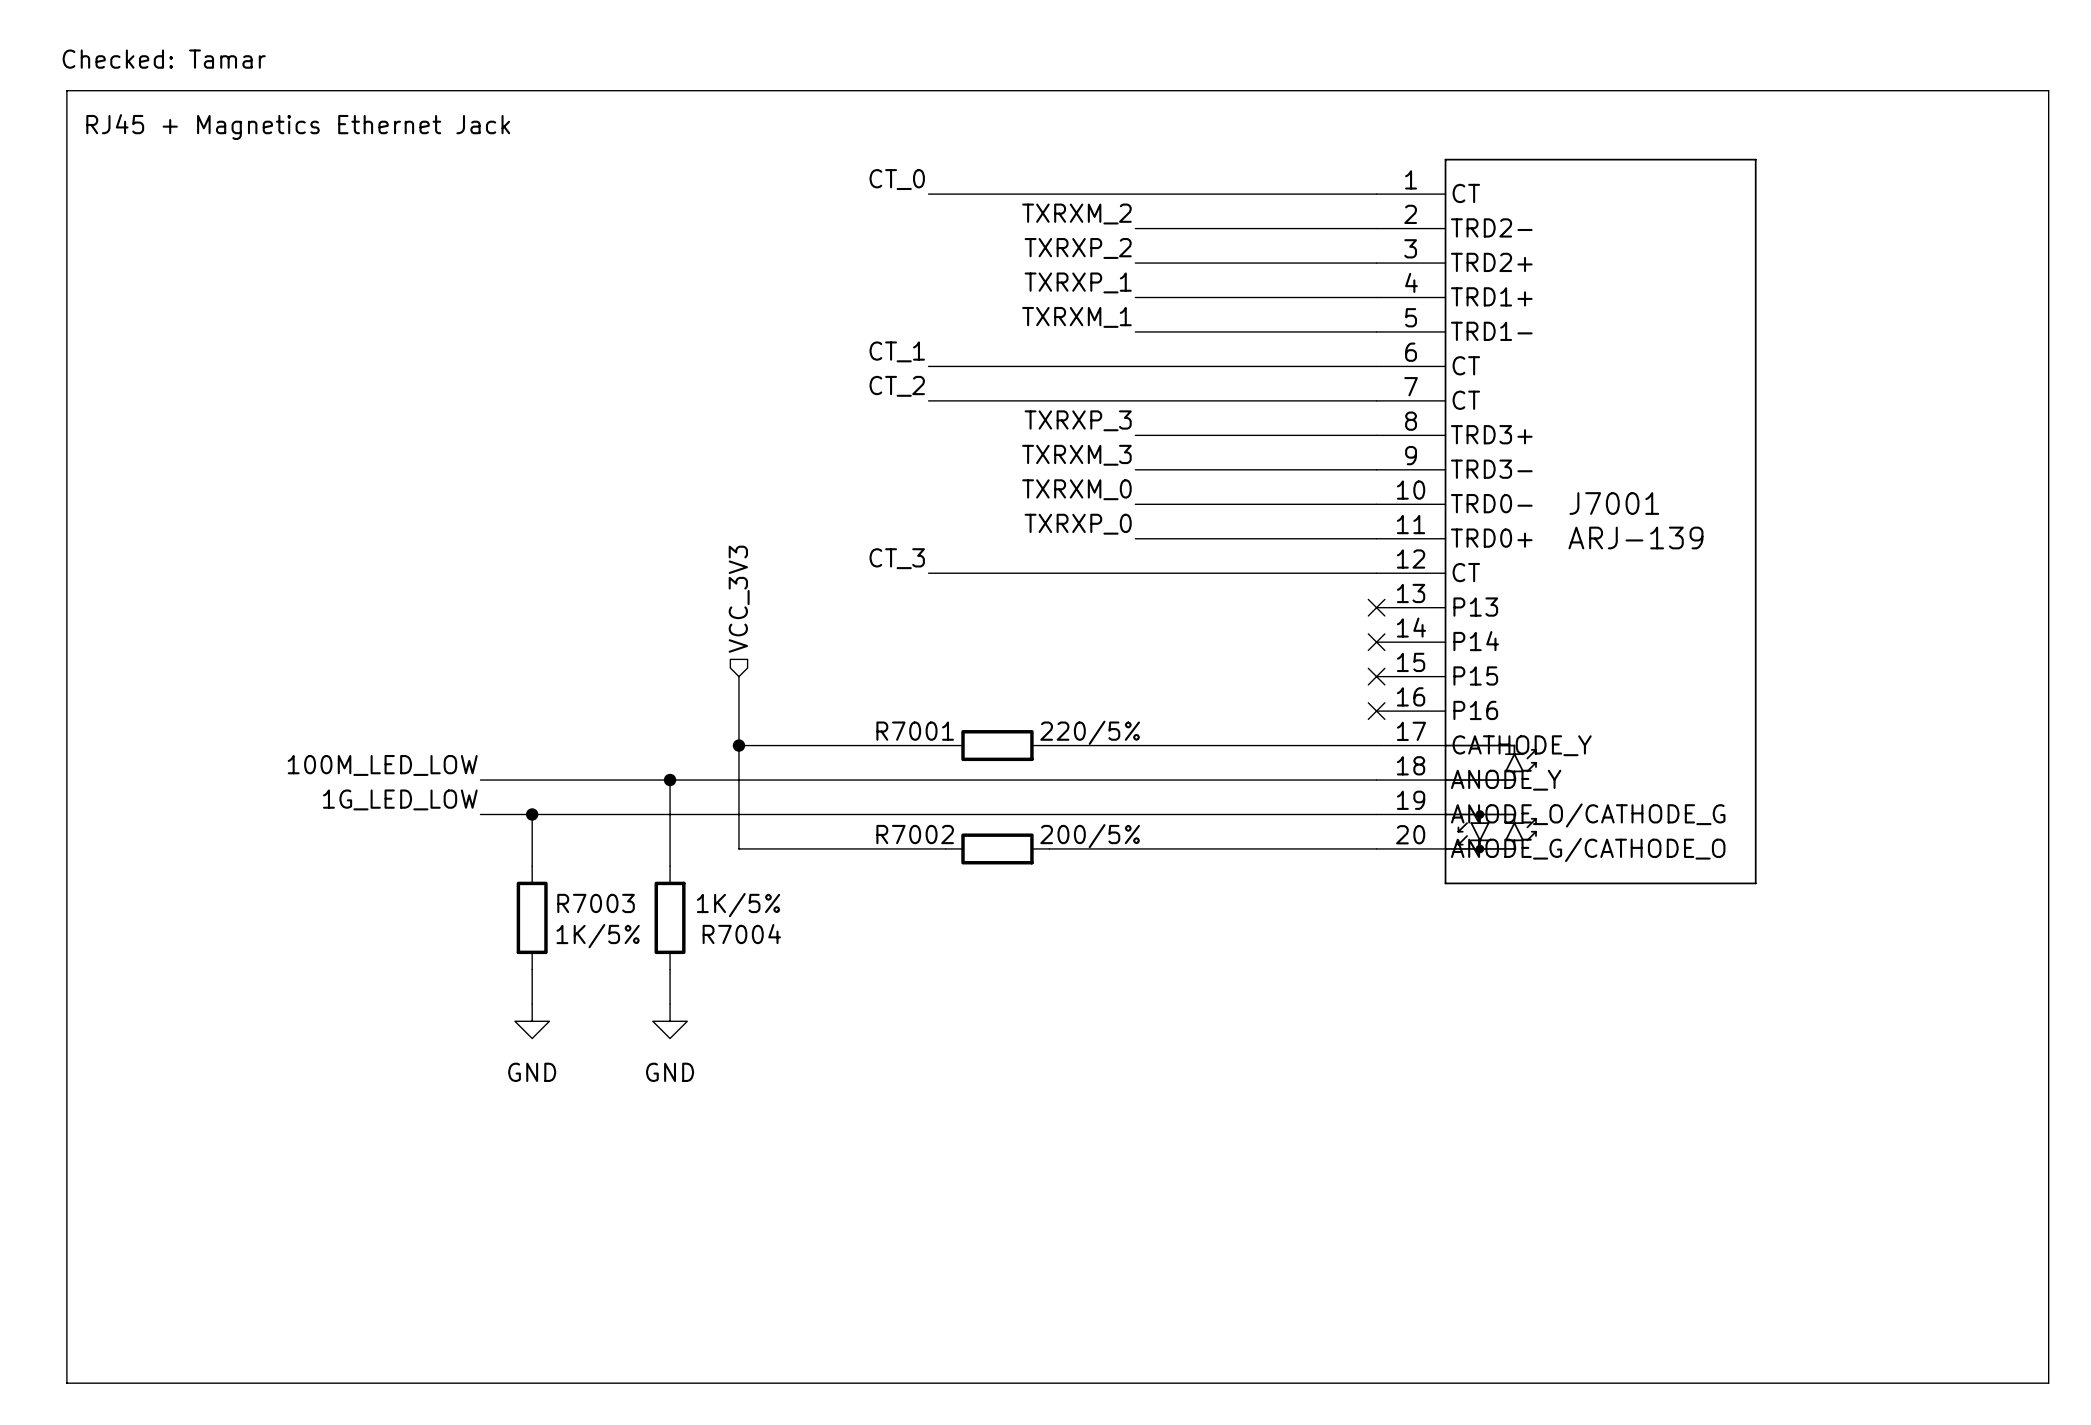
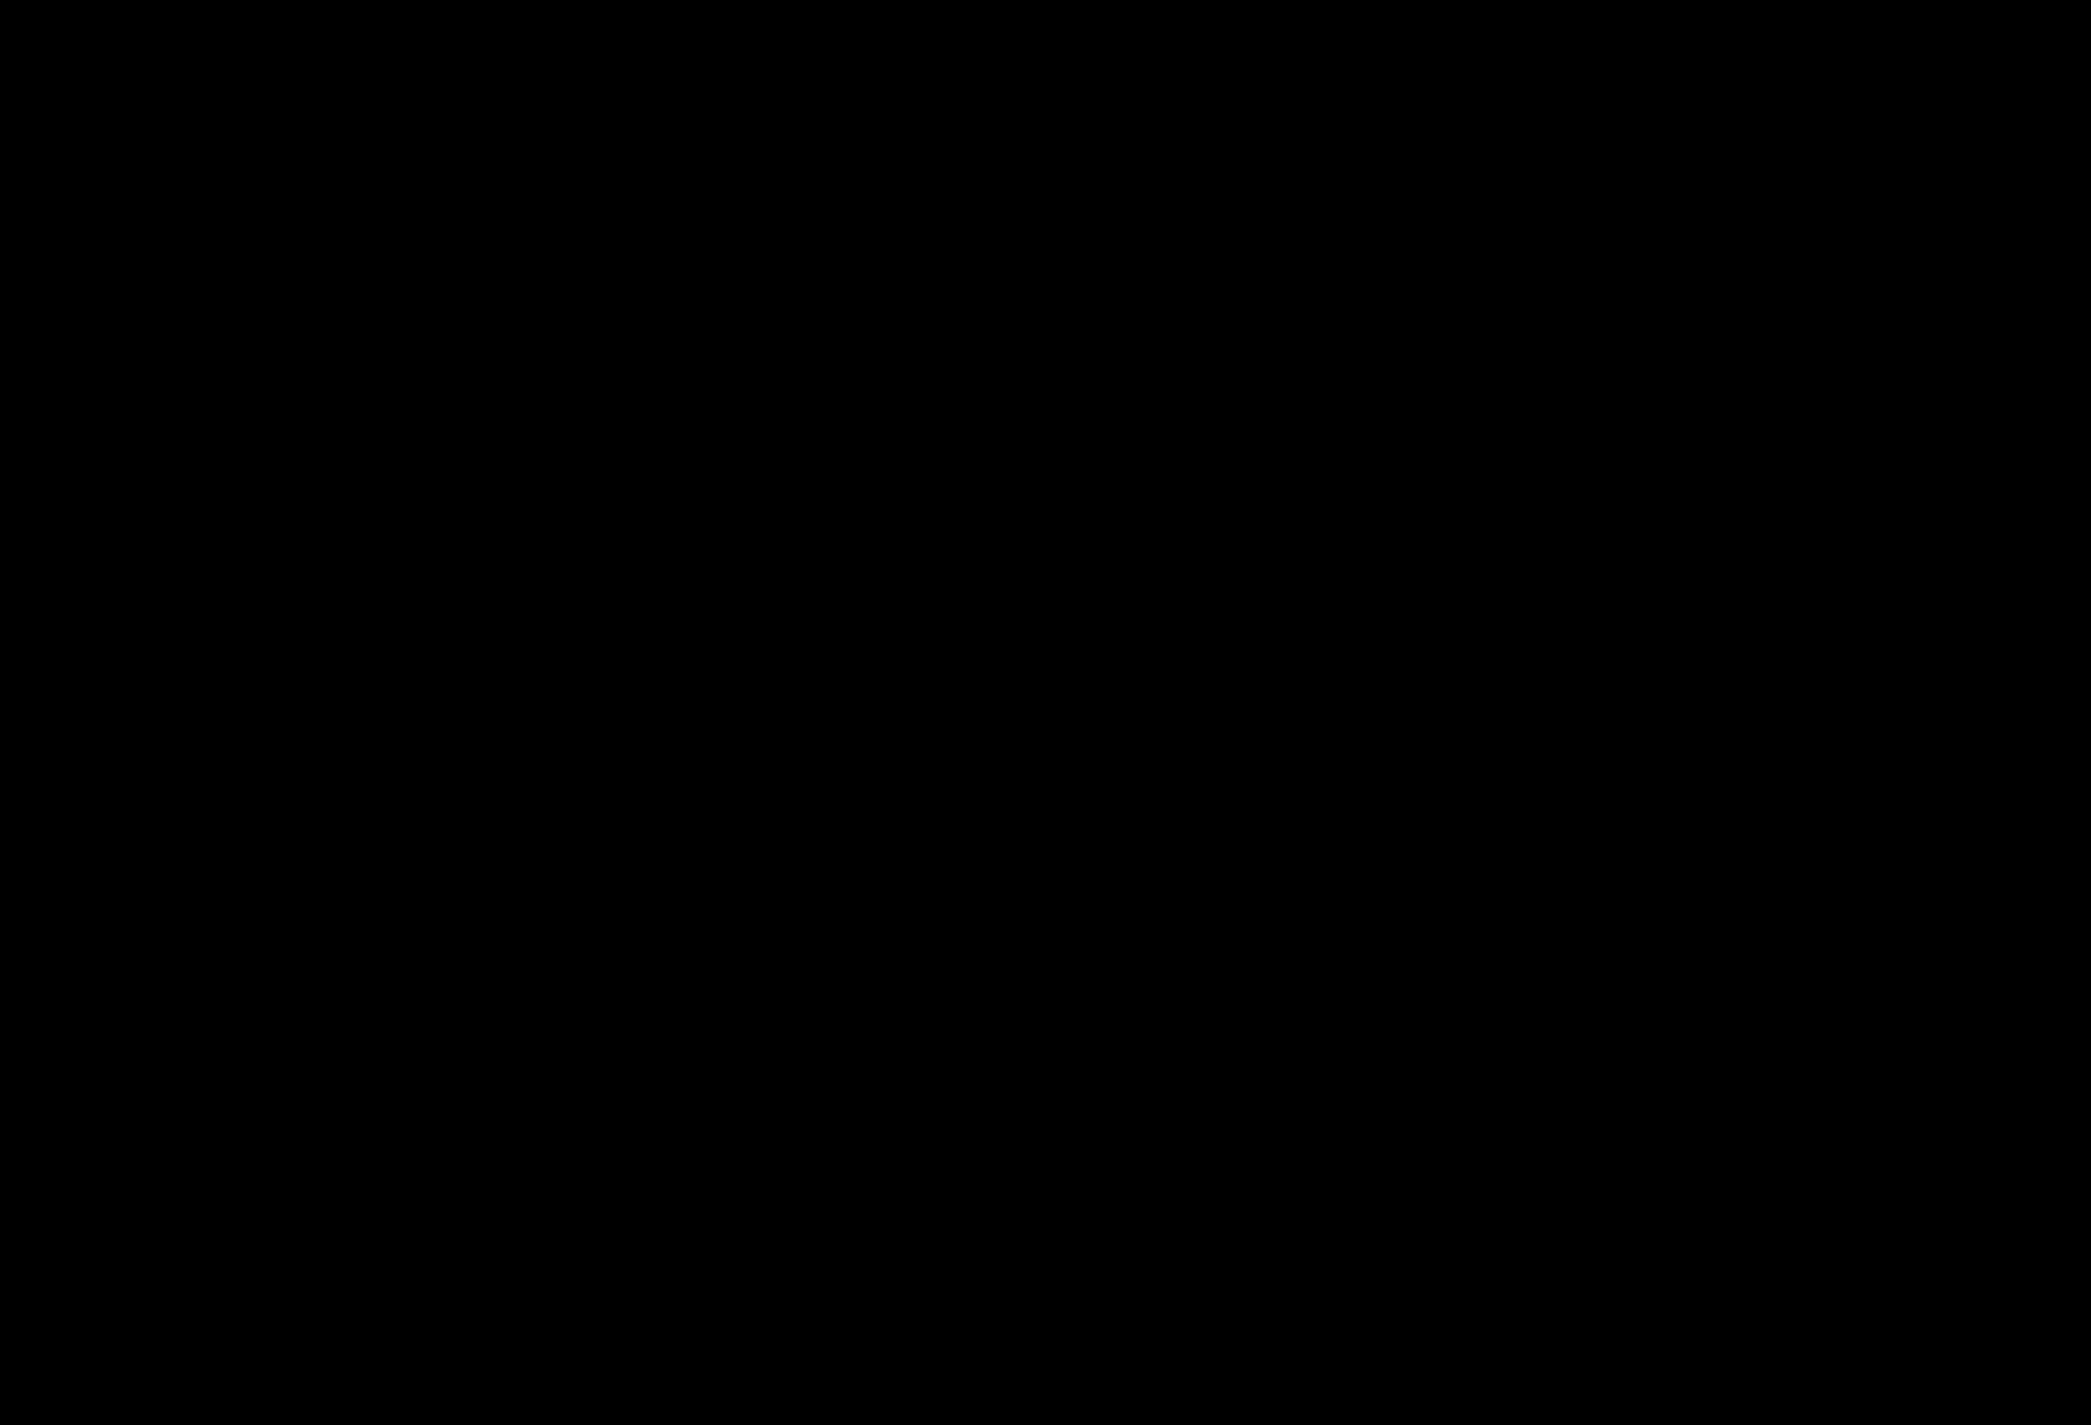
text: Checked: Tamar (164, 59) -> none
line: (66, 90) (2048, 90) (2048, 1383) (66, 1383) (66, 90) -> none
text: RJ45 + Magnetics Ethernet Jack (298, 127) -> none
label: CT_0 (897, 179) -> none
wire: (928, 194) (1376, 194) -> none
label: TXRXM_2 (1076, 214) -> none
wire: (1135, 228) (1376, 228) -> none
label: TXRXP_2 (1078, 248) -> none
wire: (1135, 263) (1376, 263) -> none
label: TXRXP_1 (1078, 282) -> none
wire: (1135, 297) (1376, 297) -> none
label: TXRXM_1 (1076, 317) -> none
wire: (1135, 331) (1376, 331) -> none
label: CT_1 (897, 351) -> none
wire: (928, 366) (1376, 366) -> none
label: CT_2 (897, 386) -> none
wire: (928, 400) (1376, 400) -> none
label: TXRXP_3 (1078, 420) -> none
wire: (1135, 435) (1376, 435) -> none
label: TXRXM_3 (1076, 455) -> none
wire: (1135, 469) (1376, 469) -> none
label: TXRXM_0 (1076, 489) -> none
wire: (1135, 504) (1376, 504) -> none
J7001: ARJ-139 (1566, 521) -> none
label: TXRXP_0 (1078, 524) -> none
wire: (1135, 538) (1376, 538) -> none
label: CT_3 (897, 558) -> none
wire: (928, 573) (1376, 573) -> none
hierarchical label: VCC_3V3 (739, 599) -> none
no-connect mark: (1376, 607) -> none
no-connect mark: (1376, 642) -> none
wire: (738, 676) (738, 848) (945, 848) -> none
no-connect mark: (1376, 676) -> none
no-connect mark: (1376, 711) -> none
wire: (738, 745) (945, 745) -> none
junction: (738, 745) -> none
R7001: 220/5% (997, 745) -> none
wire: (1049, 745) (1376, 745) -> none
label: 100M_LED_LOW (382, 765) -> none
wire: (480, 780) (1376, 780) -> none
wire: (670, 780) (670, 866) -> none
junction: (670, 780) -> none
label: 1G_LED_LOW (400, 799) -> none
wire: (480, 814) (1376, 814) -> none
wire: (532, 814) (532, 866) -> none
junction: (532, 814) -> none
R7002: 200/5% (997, 848) -> none
wire: (1049, 848) (1376, 848) -> none
R7003: 1K/5% (532, 917) -> none
R7004: 1K/5% (670, 917) -> none
wire: (532, 969) (532, 1004) -> none
wire: (670, 969) (670, 1004) -> none
power symbol: GND (532, 1021) -> none
power symbol: GND (670, 1021) -> none

